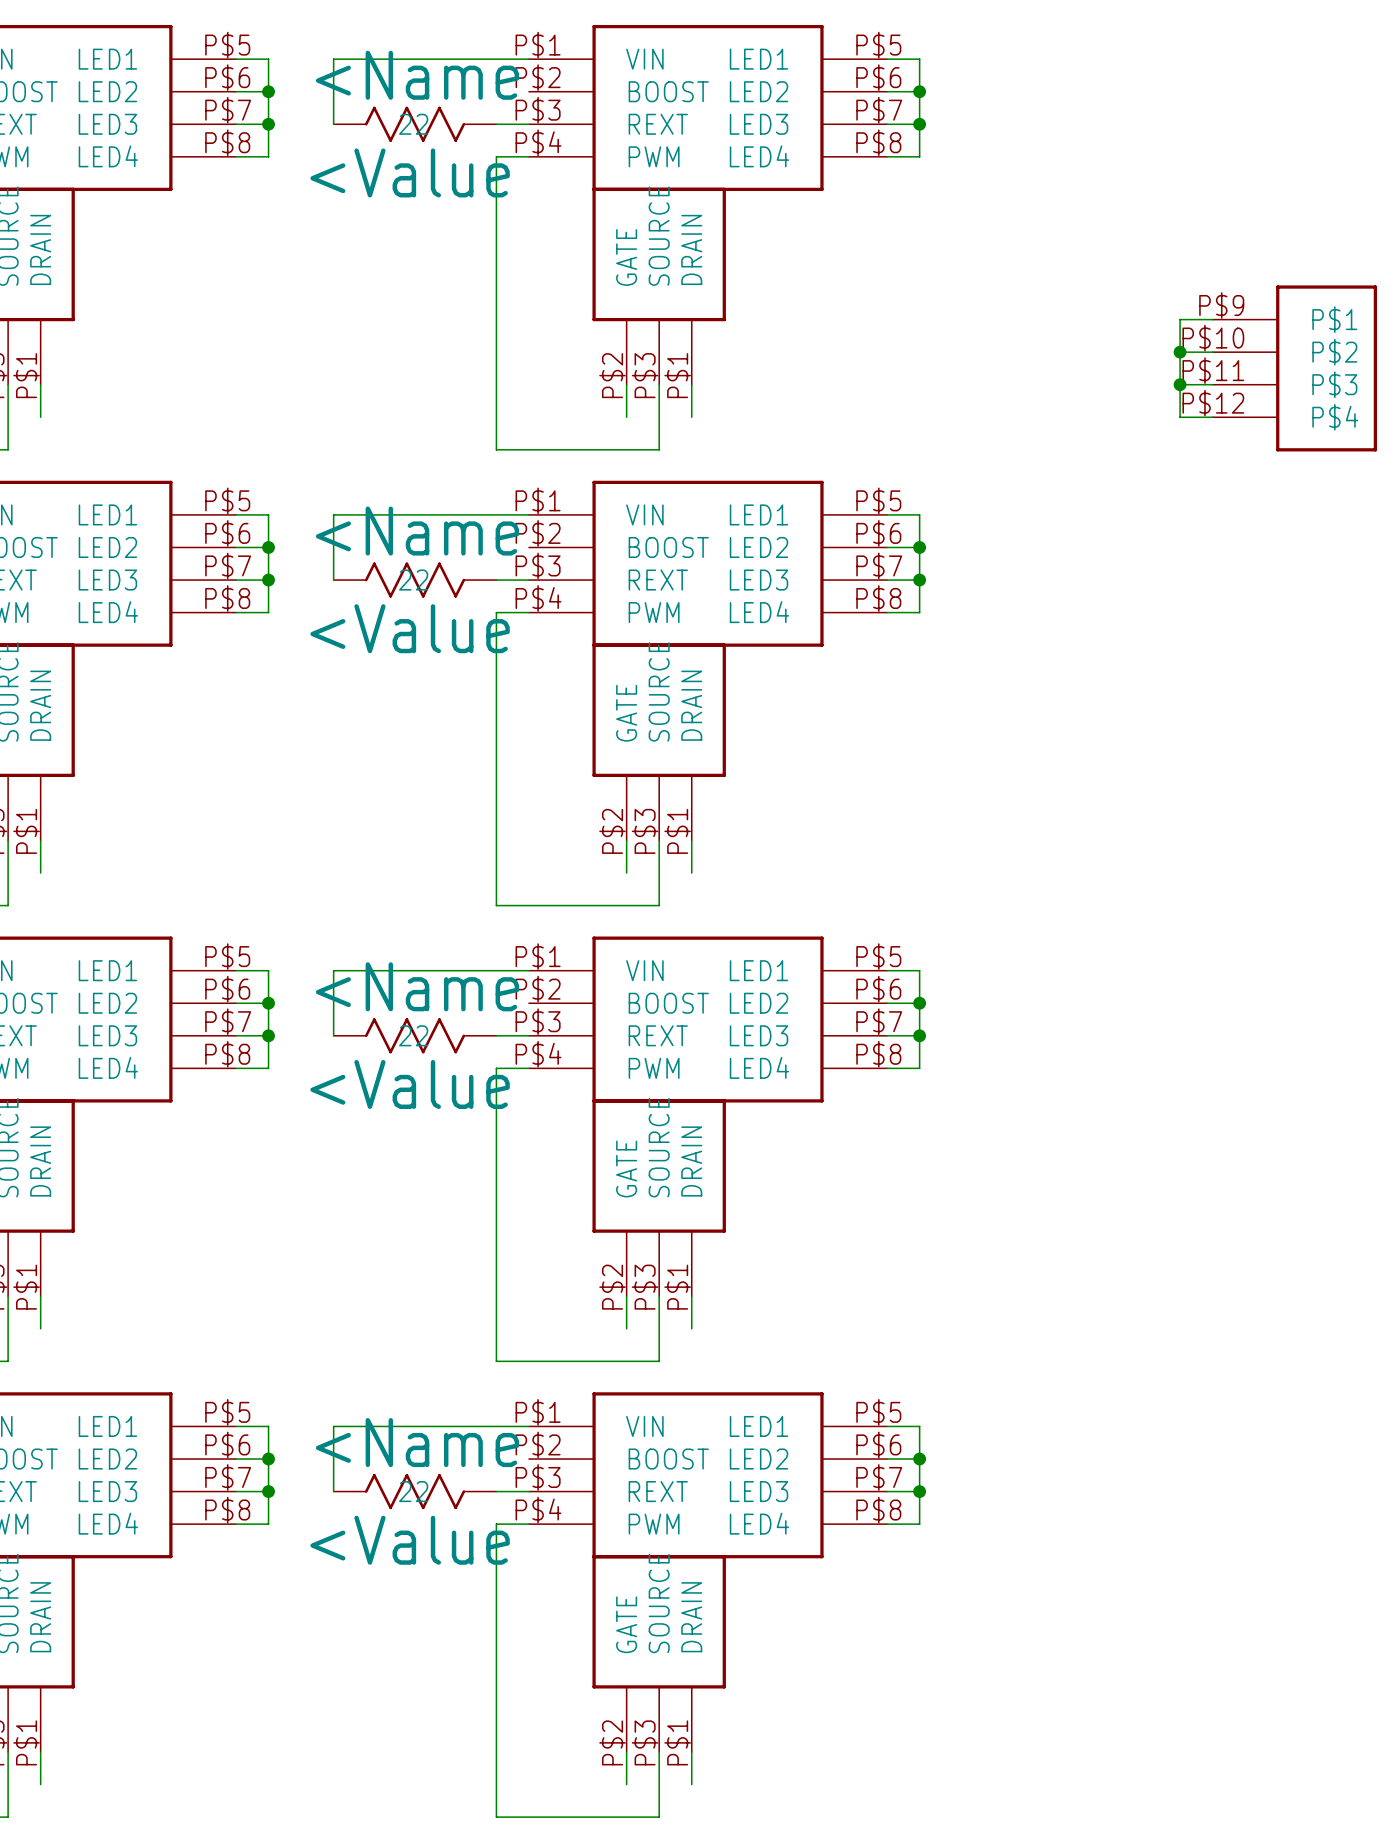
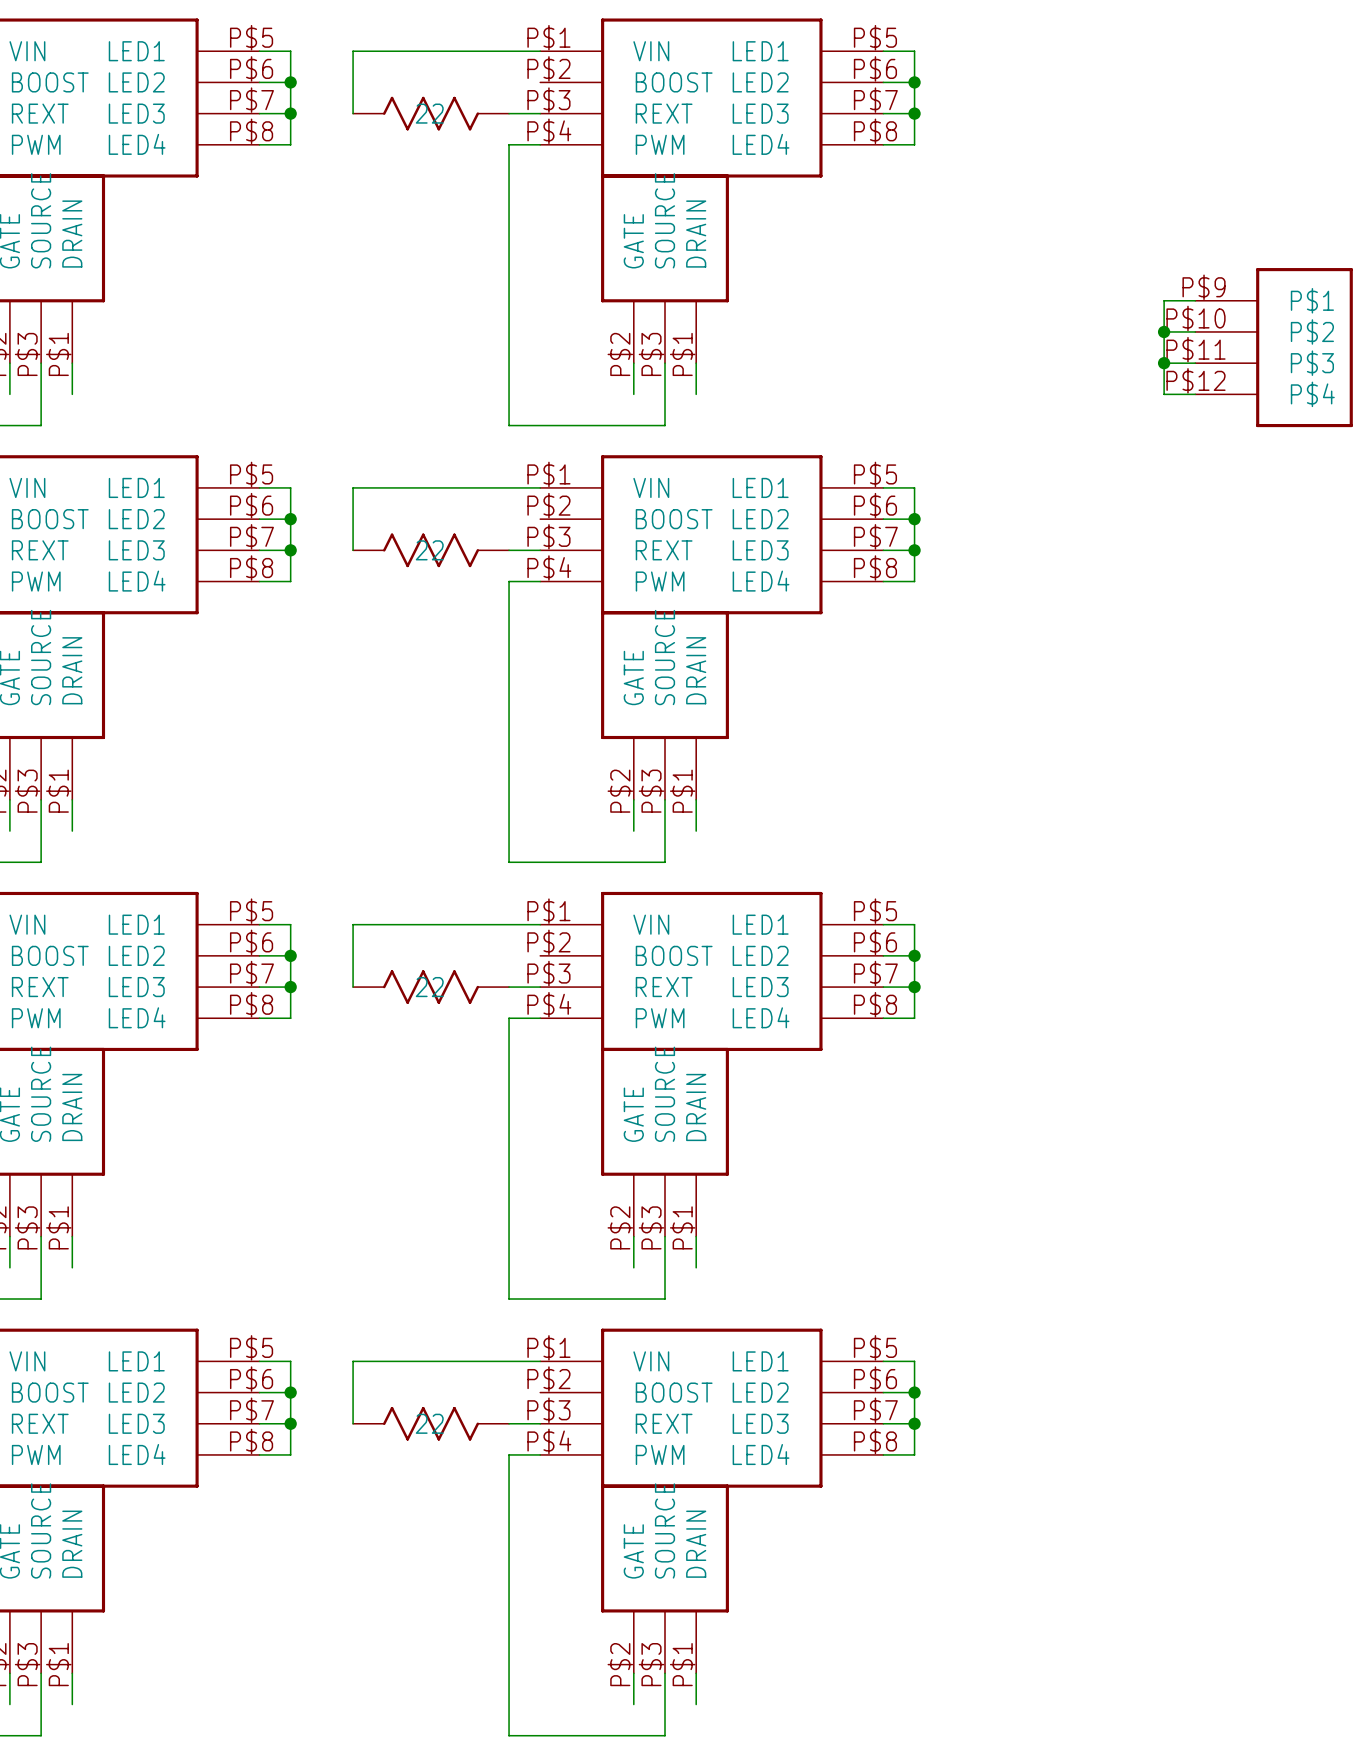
part text: <Name (417, 75) -> none
part text: <Value (410, 172) -> none
part text: <Name (417, 531) -> none
part text: <Value (410, 628) -> none
part text: <Name (417, 986) -> none
part text: <Value (410, 1084) -> none
part text: <Name (417, 1442) -> none
part text: <Value (410, 1540) -> none

